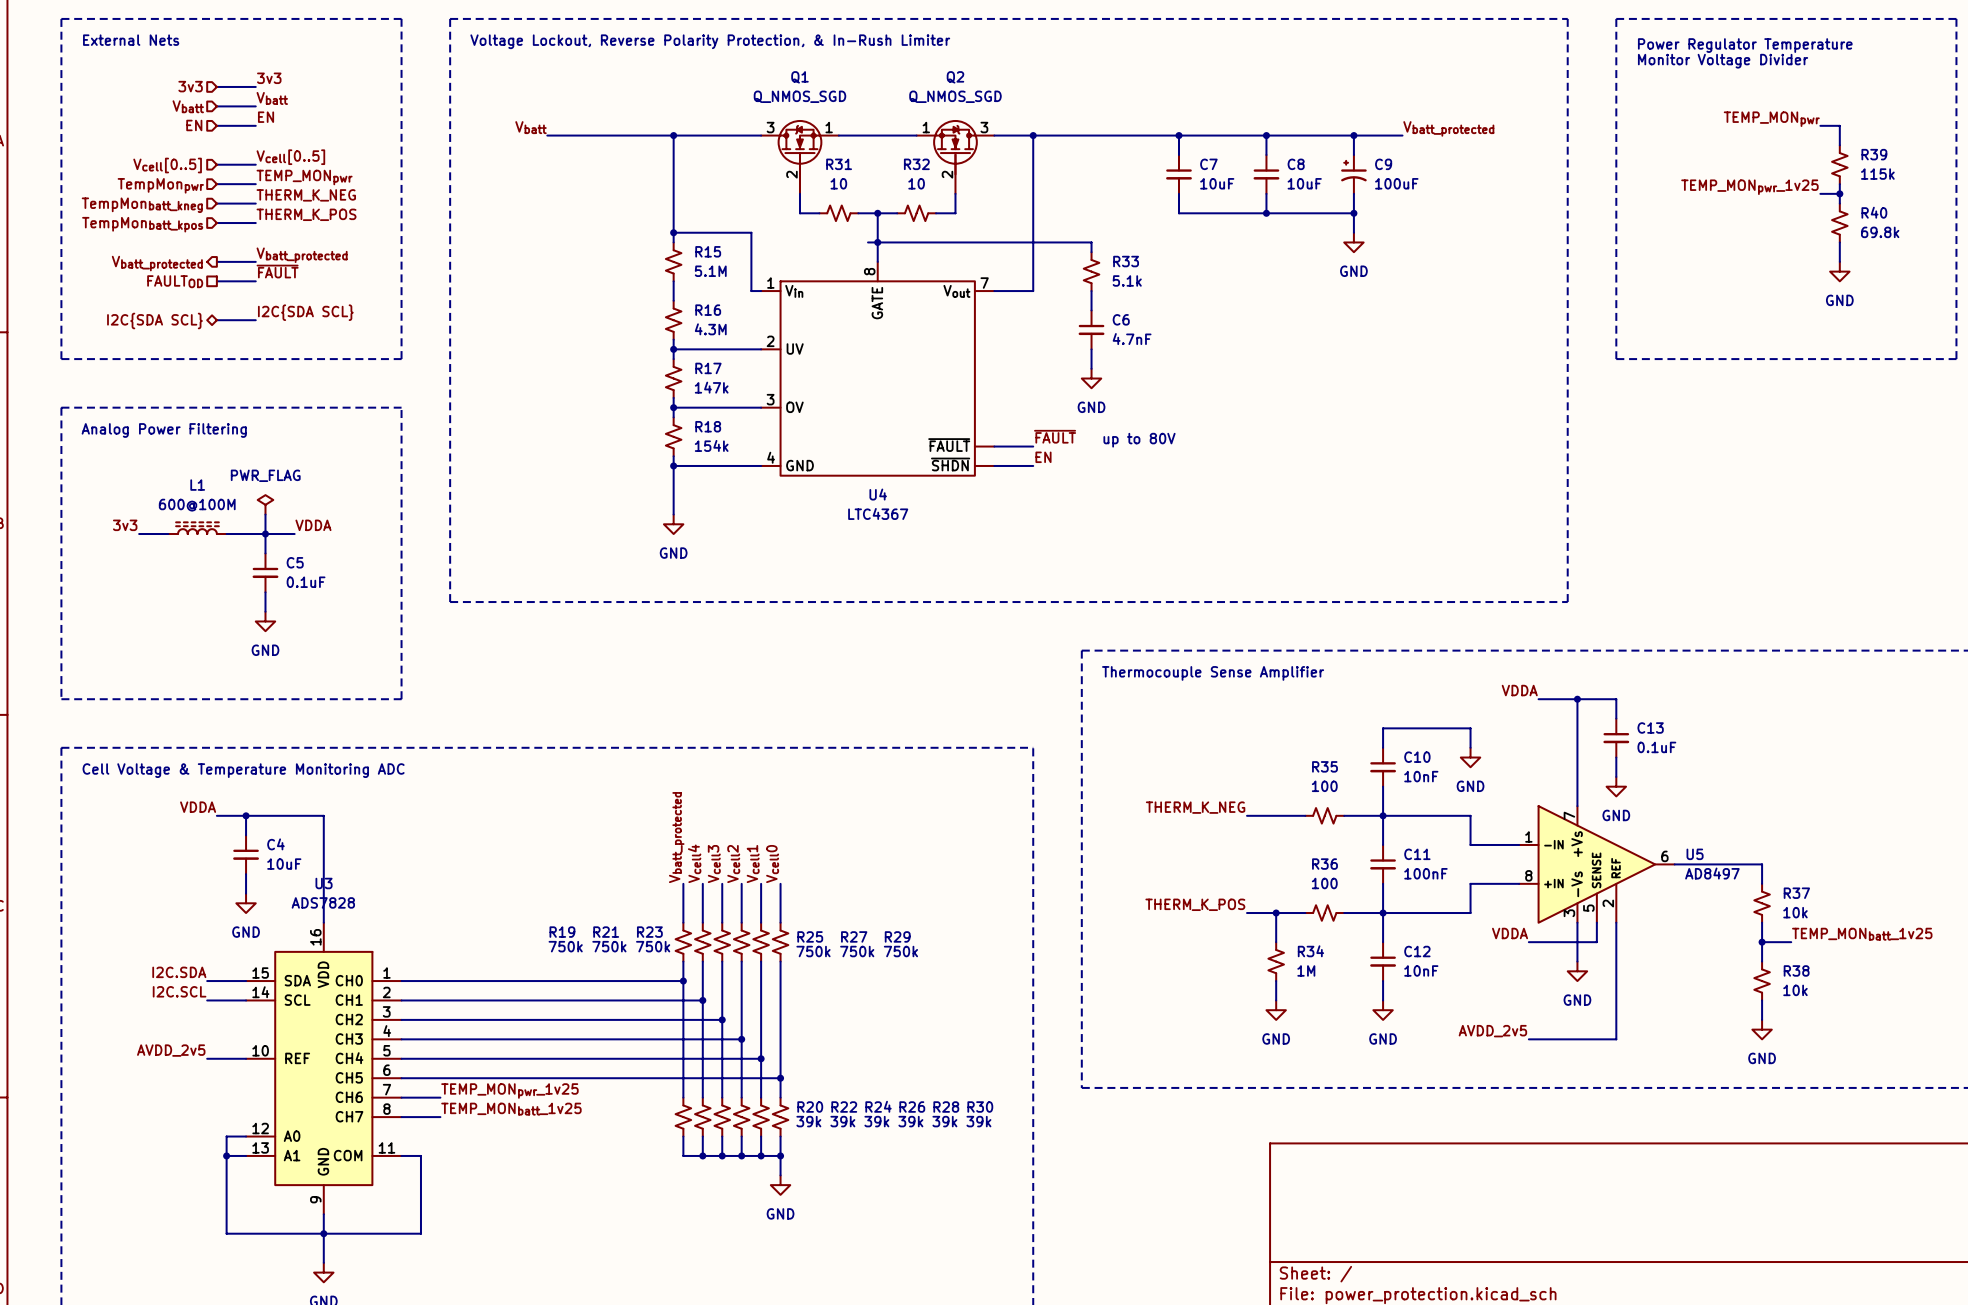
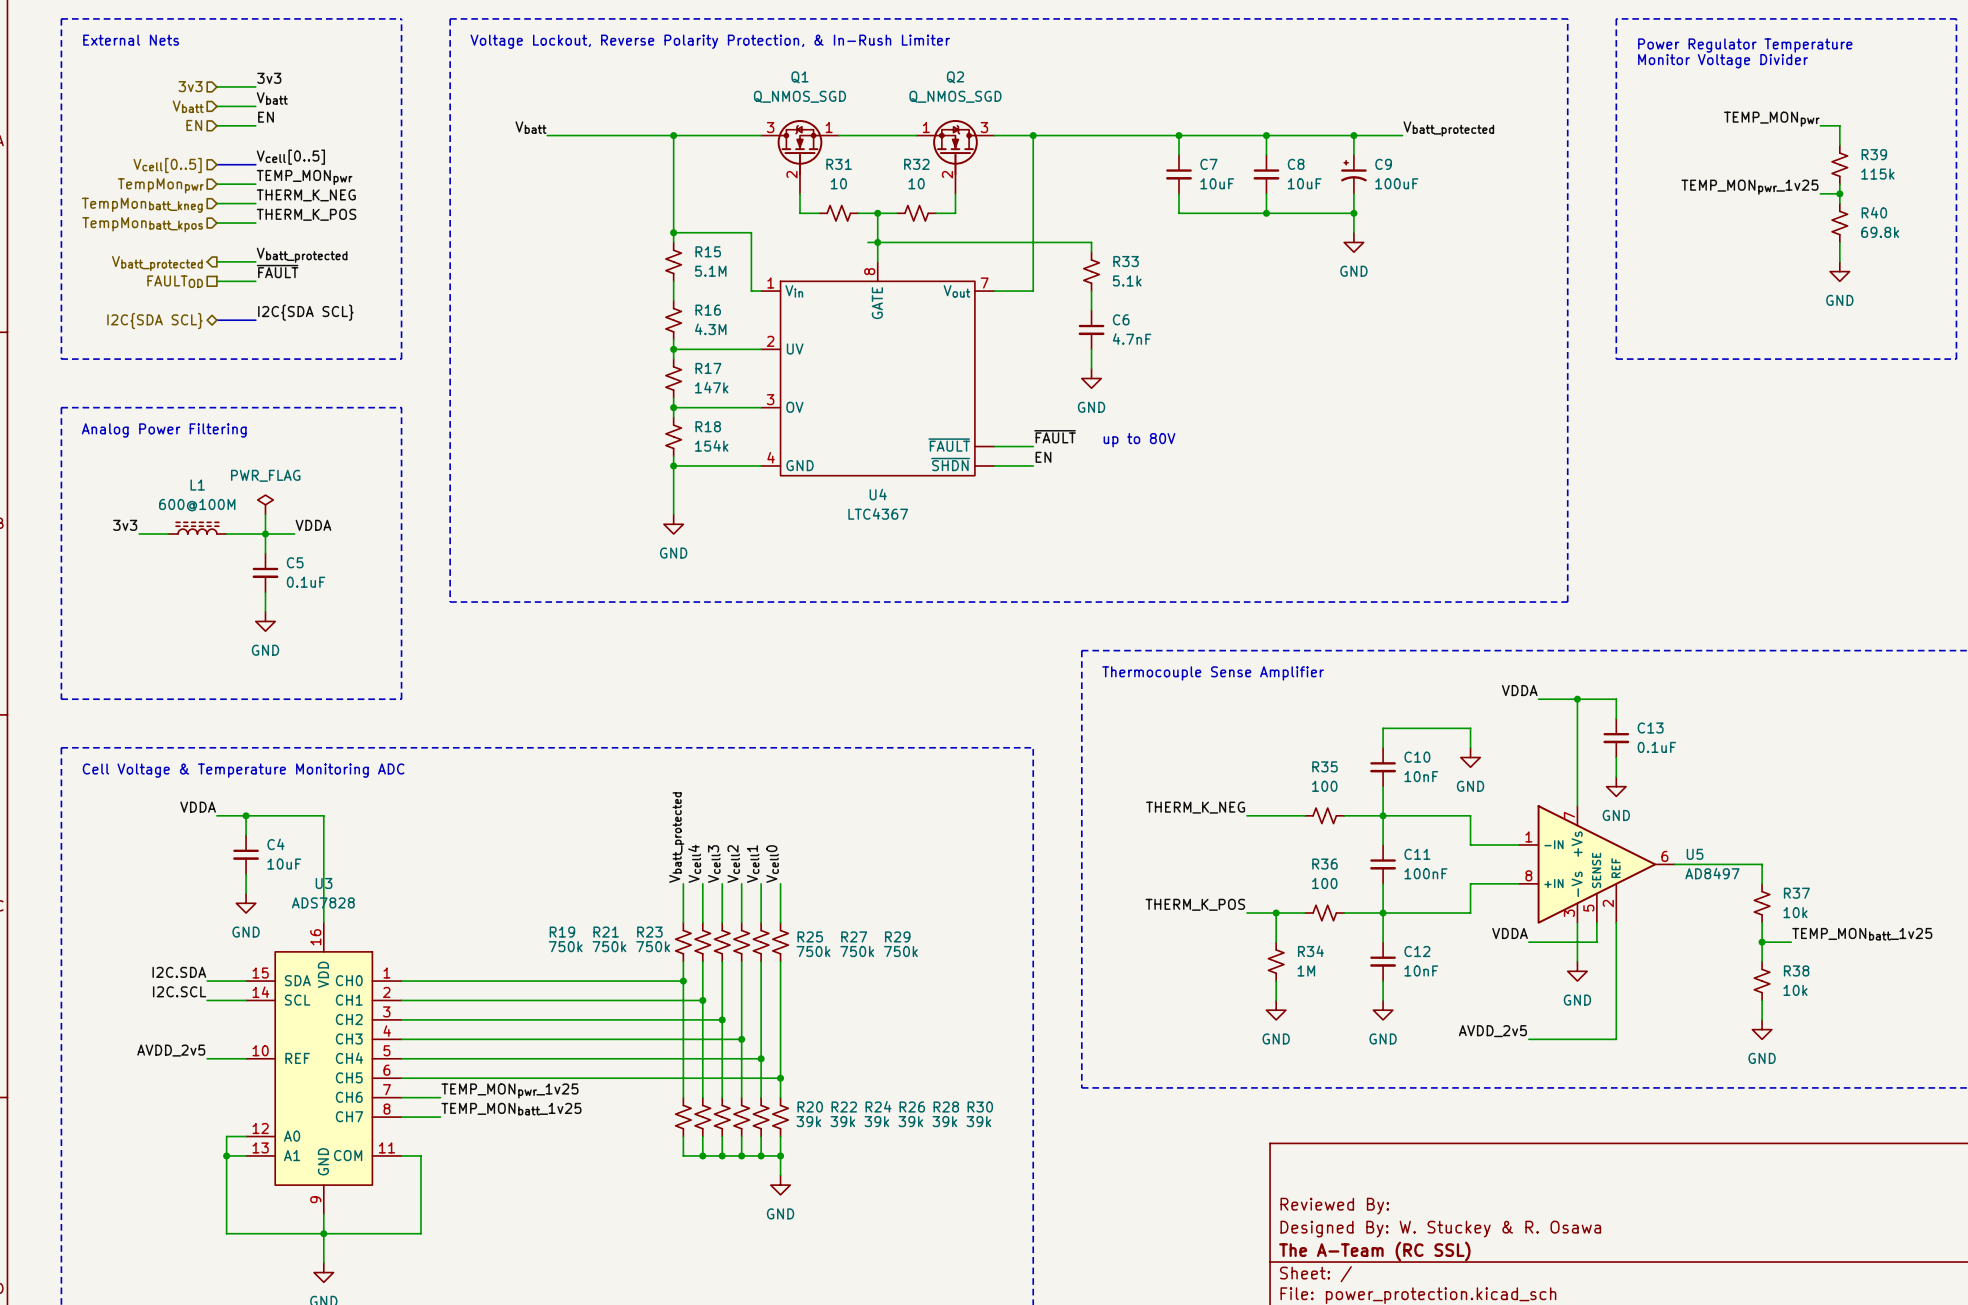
title block: none -> Reviewed By: (1334, 1206)
title block: none -> Designed By: W. Stuckey & R. Osawa (1440, 1229)
title block: none -> The A-Team (RC SSL) (1374, 1251)

